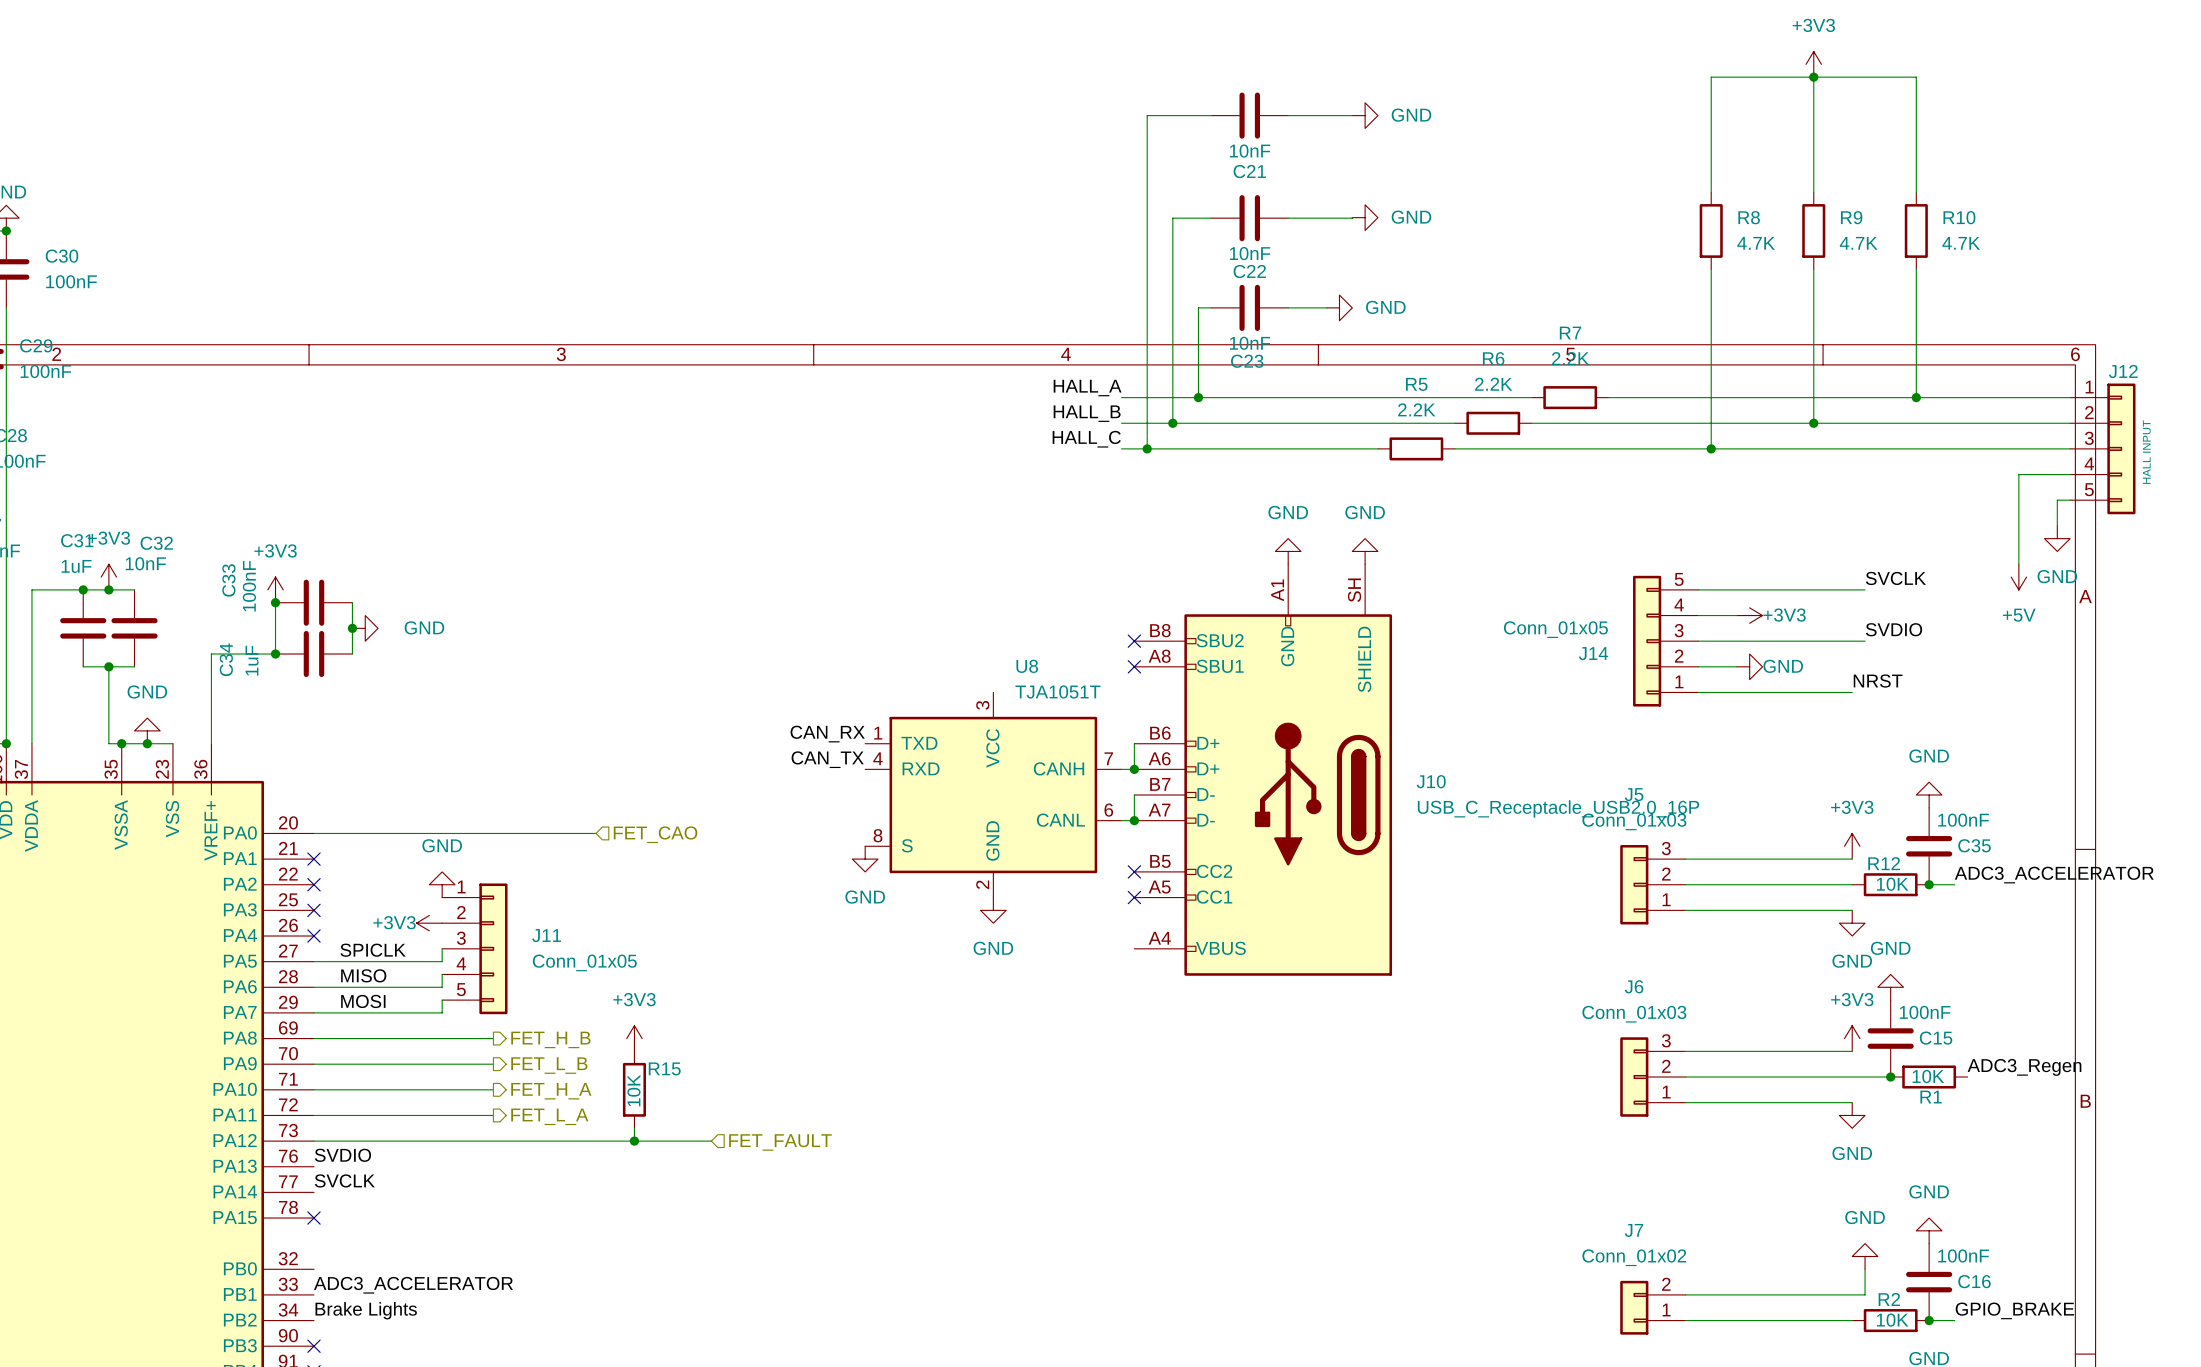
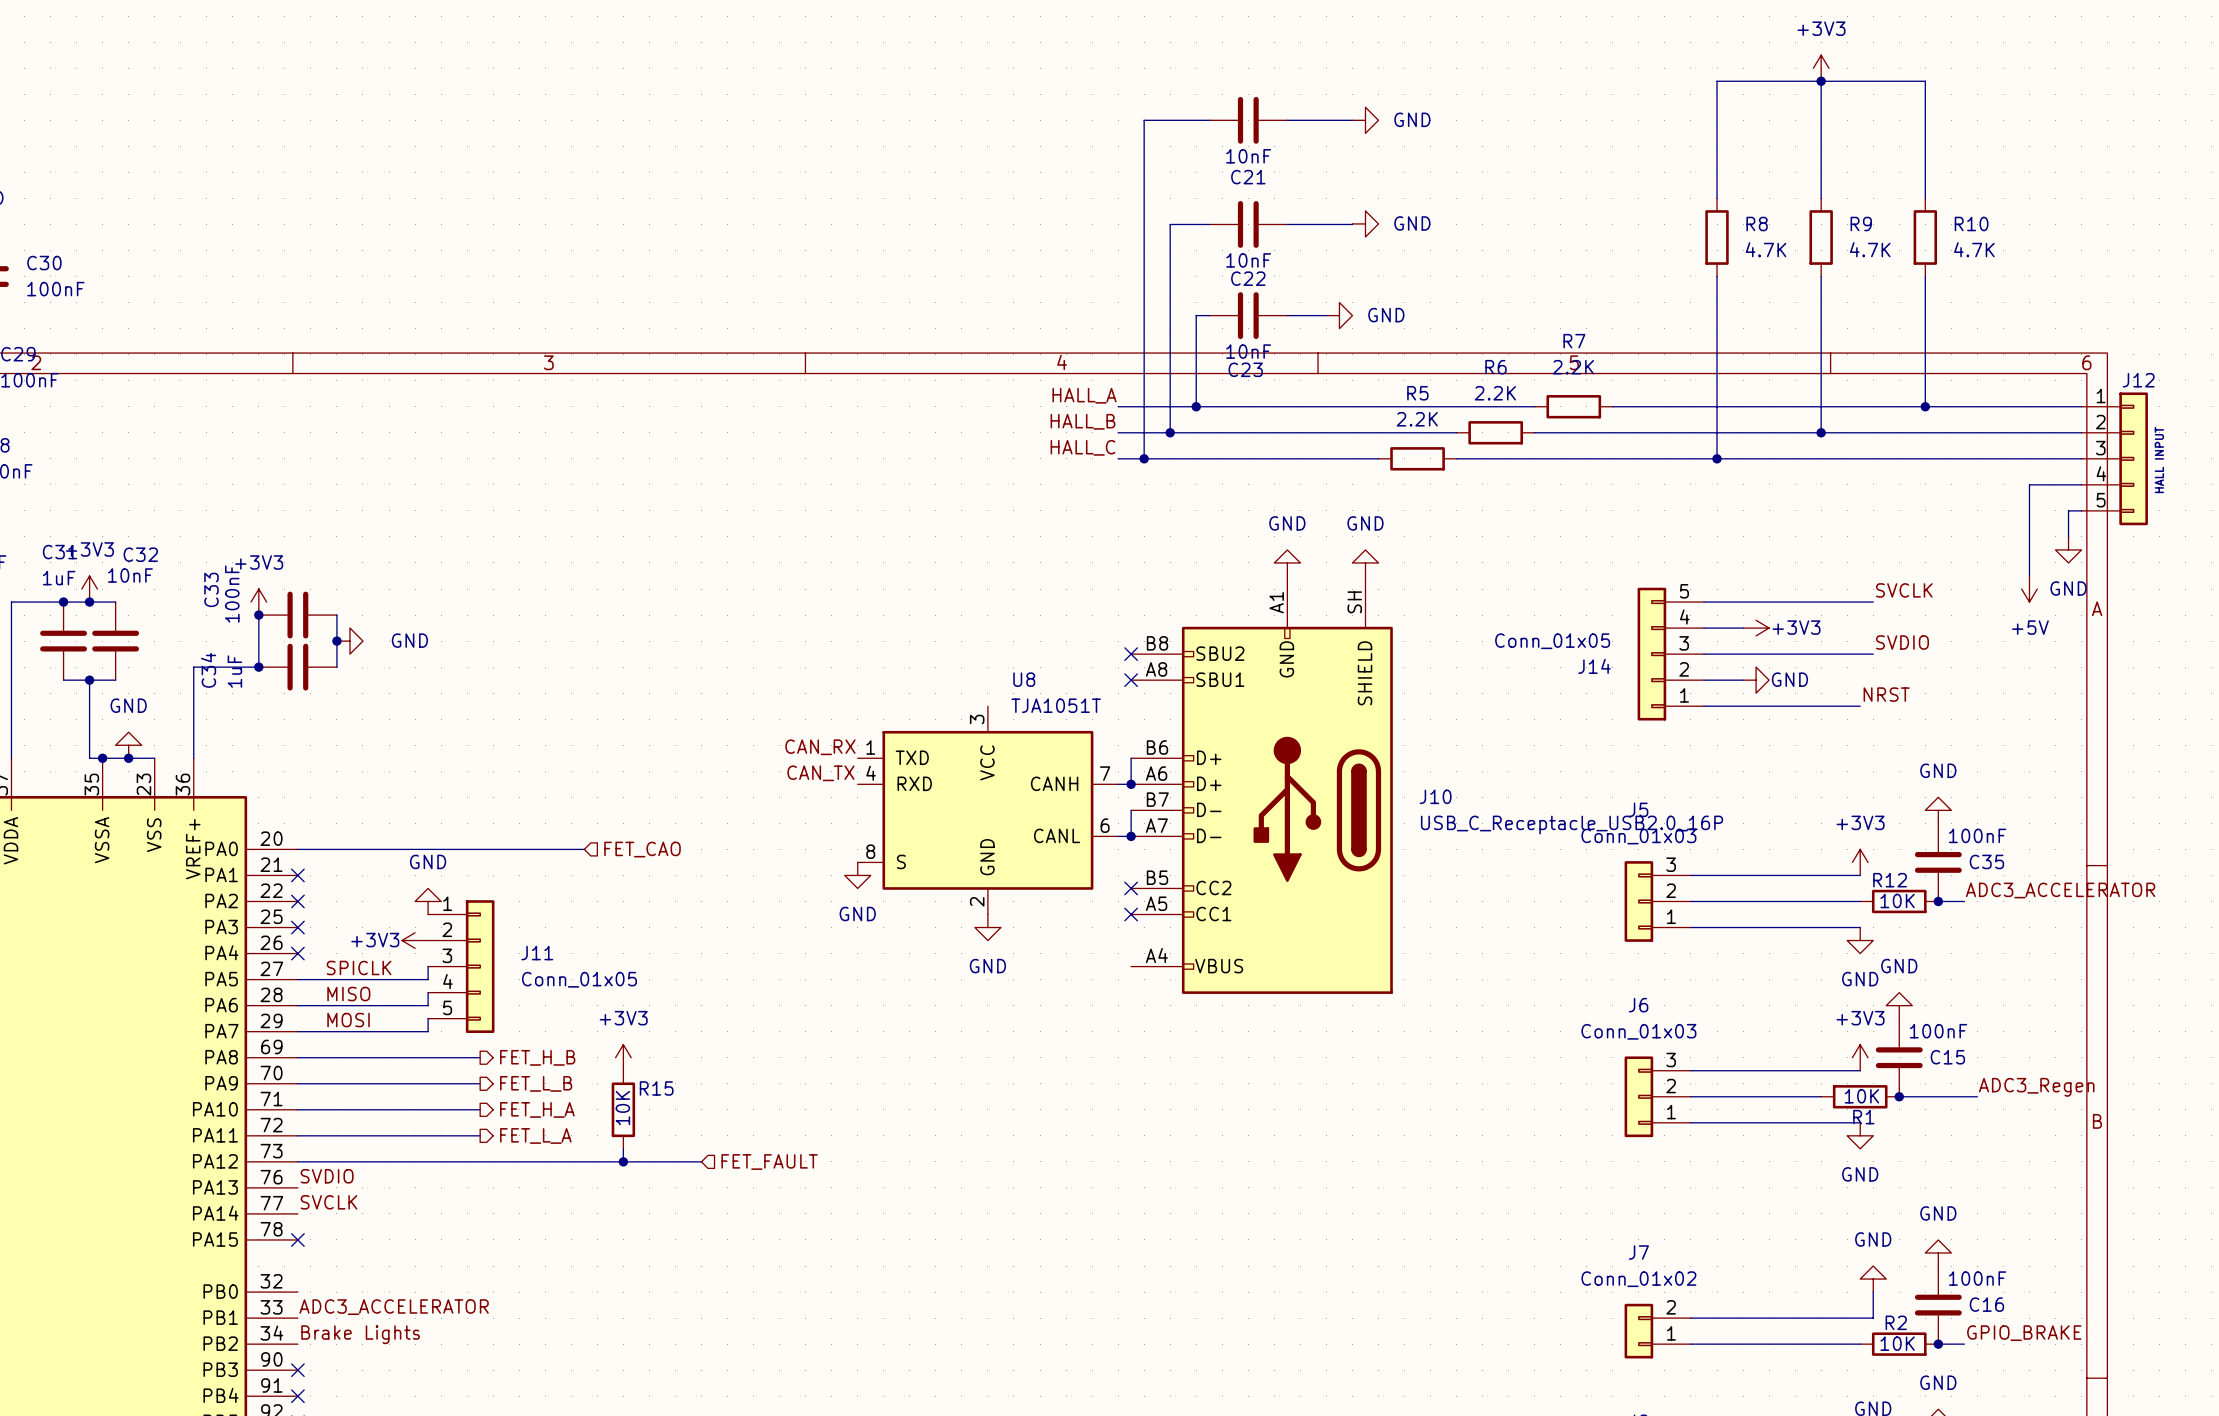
wire: (1813, 1077) (1890, 1077) -> (1977, 1096) (1899, 1096)
R1 position: (1929, 1077) -> (1860, 1096)

